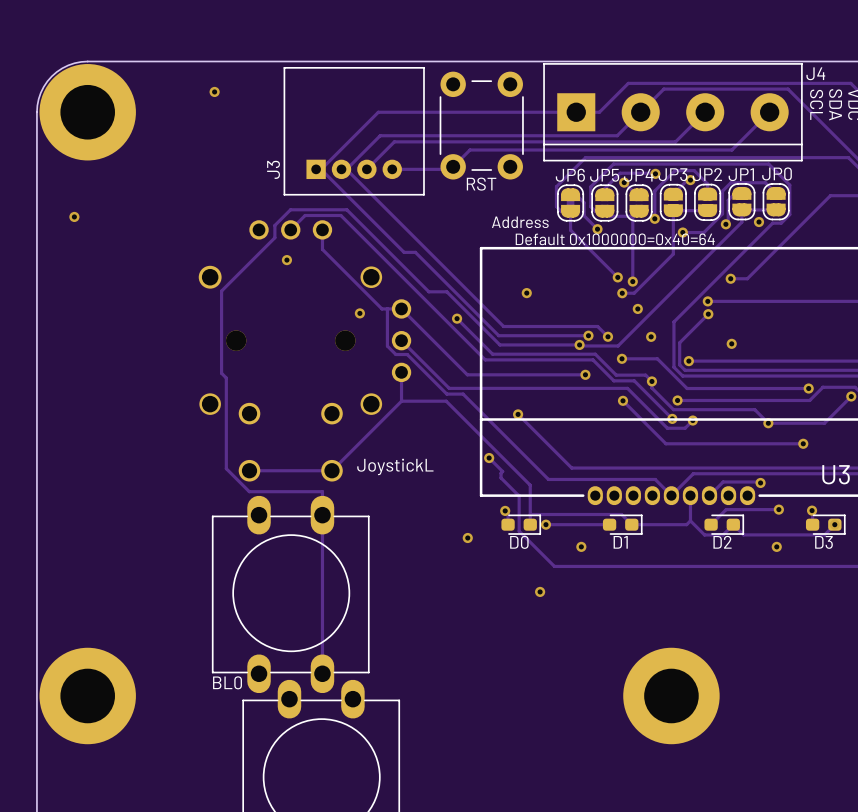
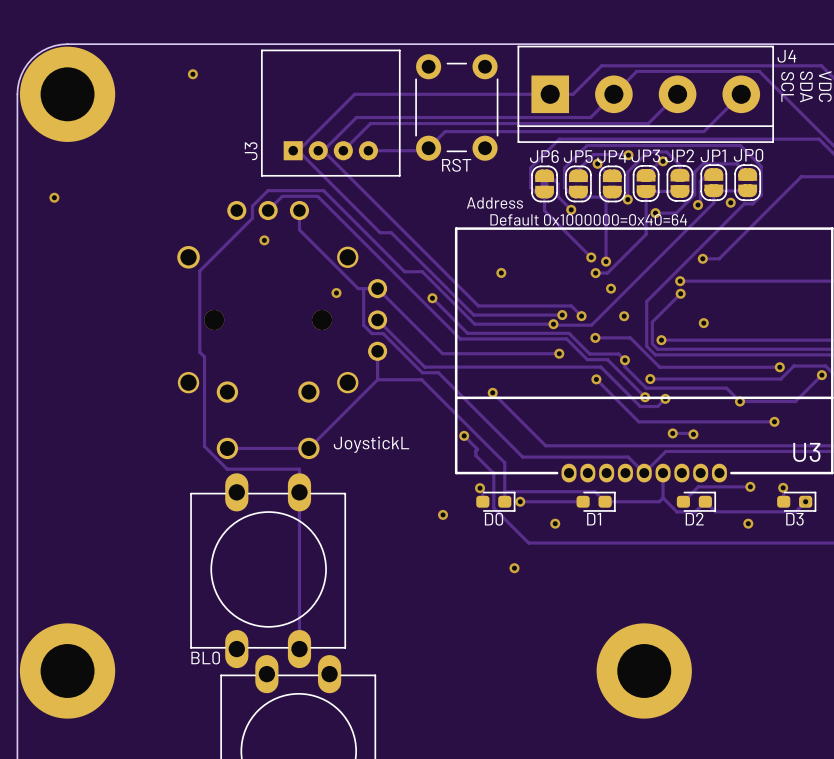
track: none -> (672, 433) (693, 434)
via: none -> (672, 433)
via: none -> (693, 434)
track: (760, 482) (723, 481) (709, 495) -> none
via: (760, 482) -> none

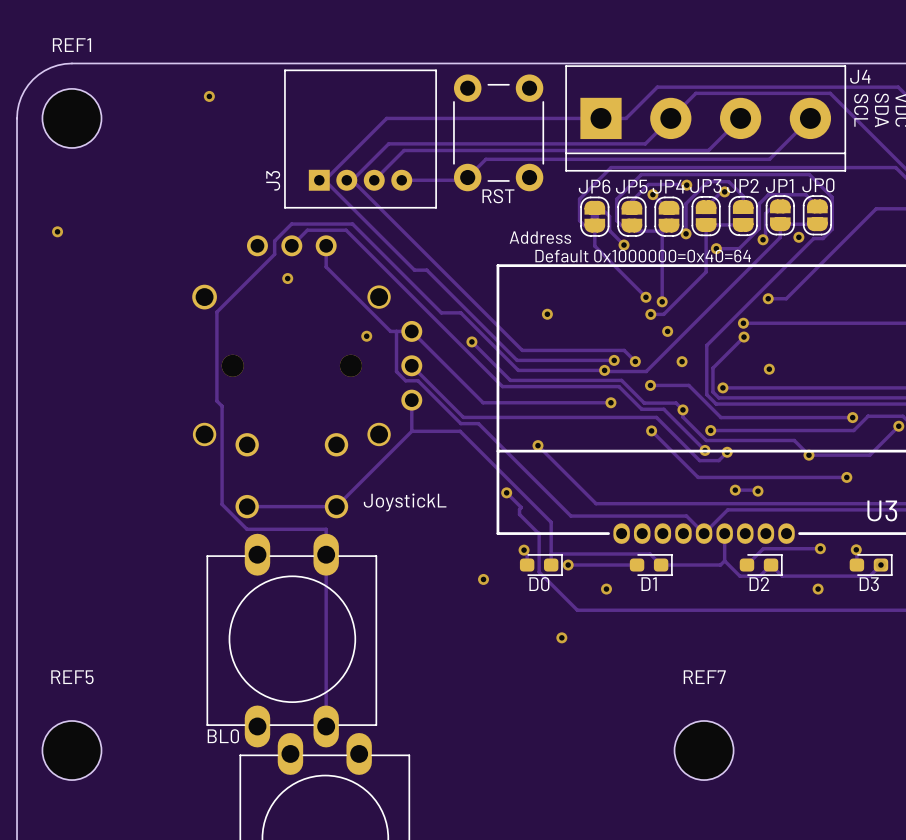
part: (67, 94) -> none
REF1: none -> (71, 118)
part: (67, 670) -> none
REF5: none -> (71, 750)
part: (644, 670) -> none
REF7: none -> (704, 750)

